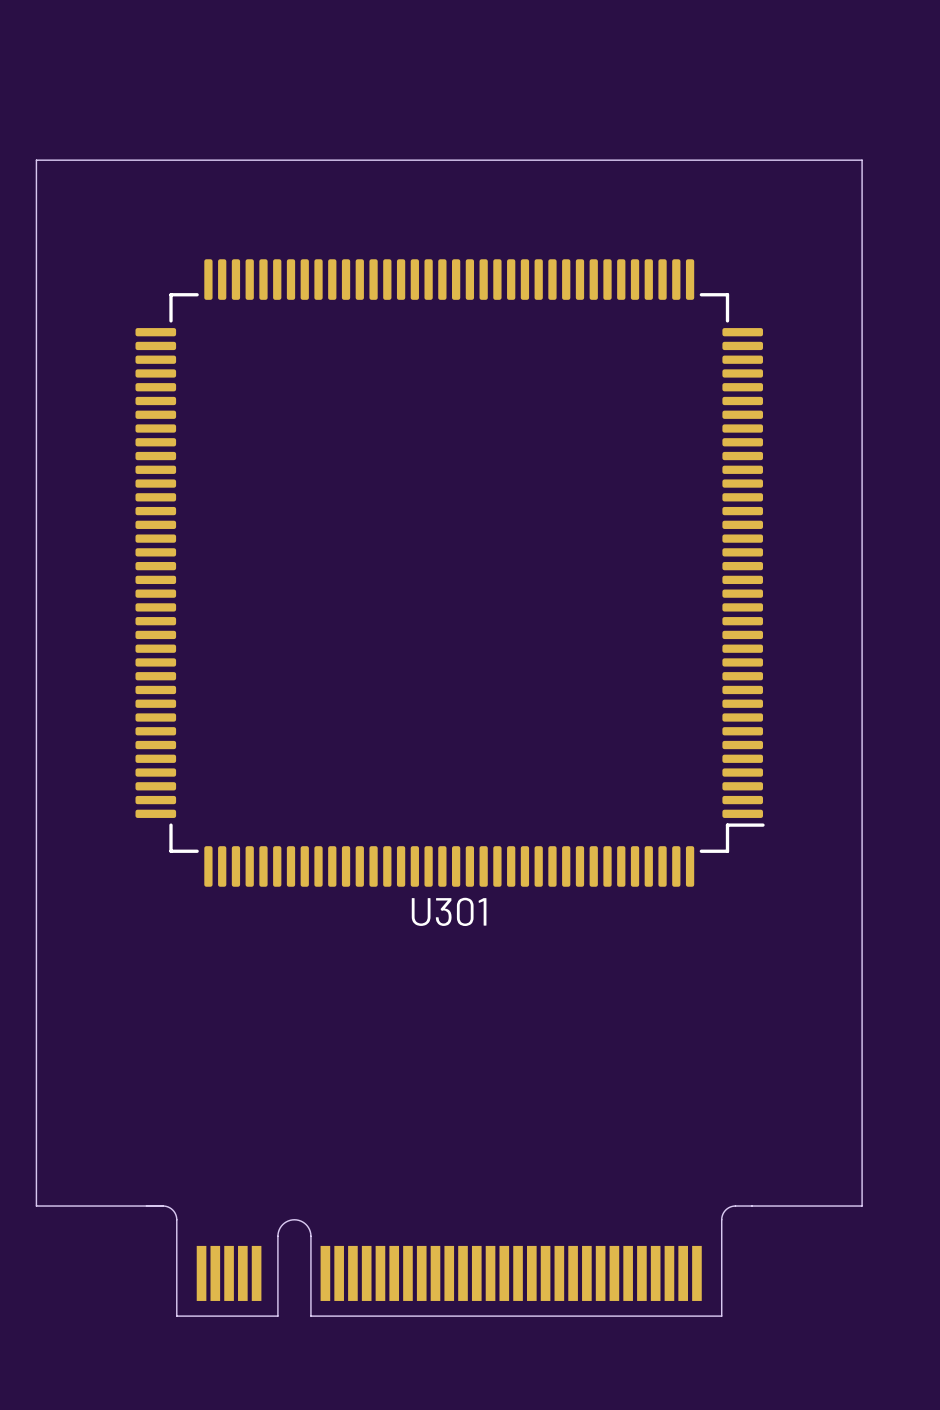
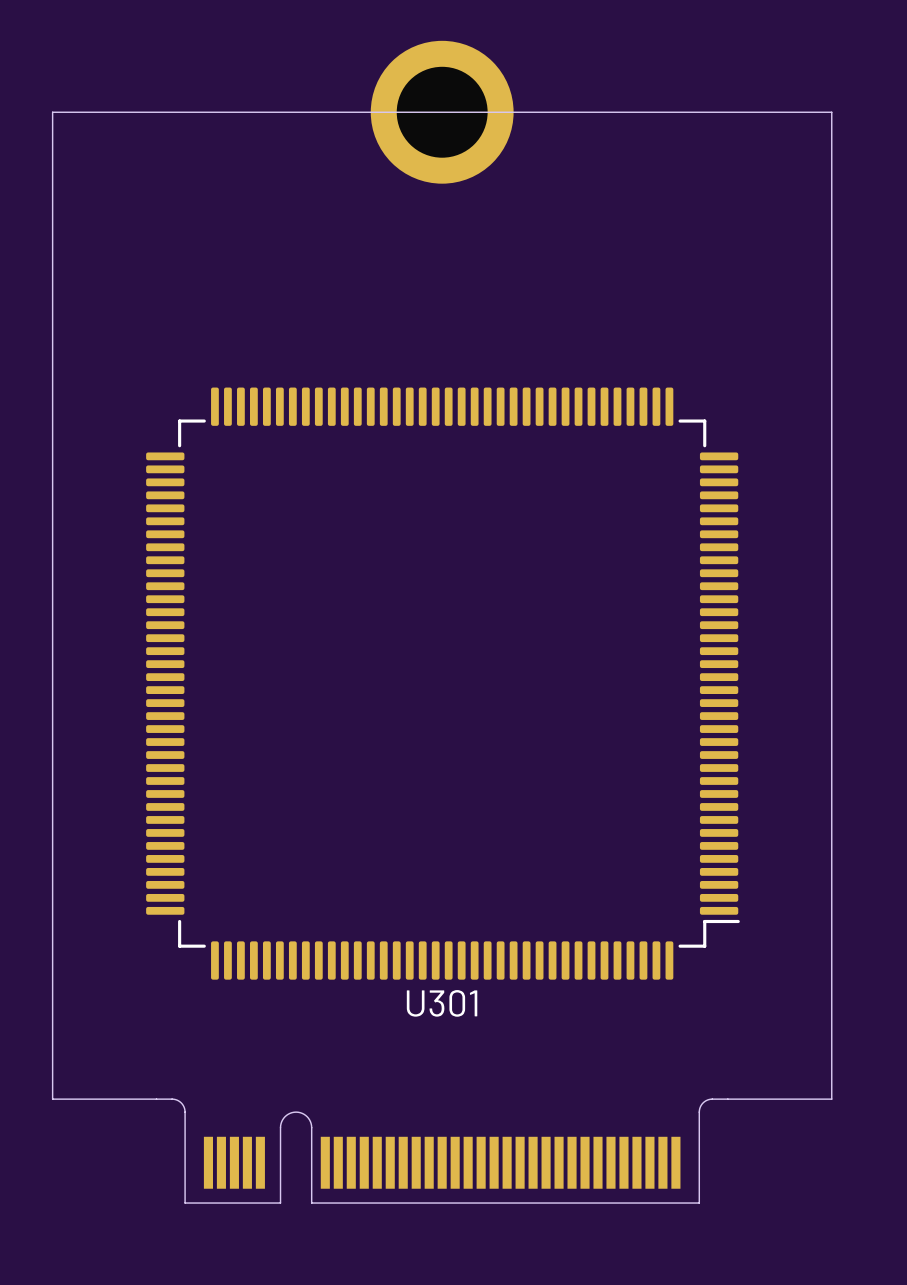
part: none -> (442, 112)
U301 position: (450, 573) -> (442, 683)
board edge: (163, 1206) (146, 1206) -> none

